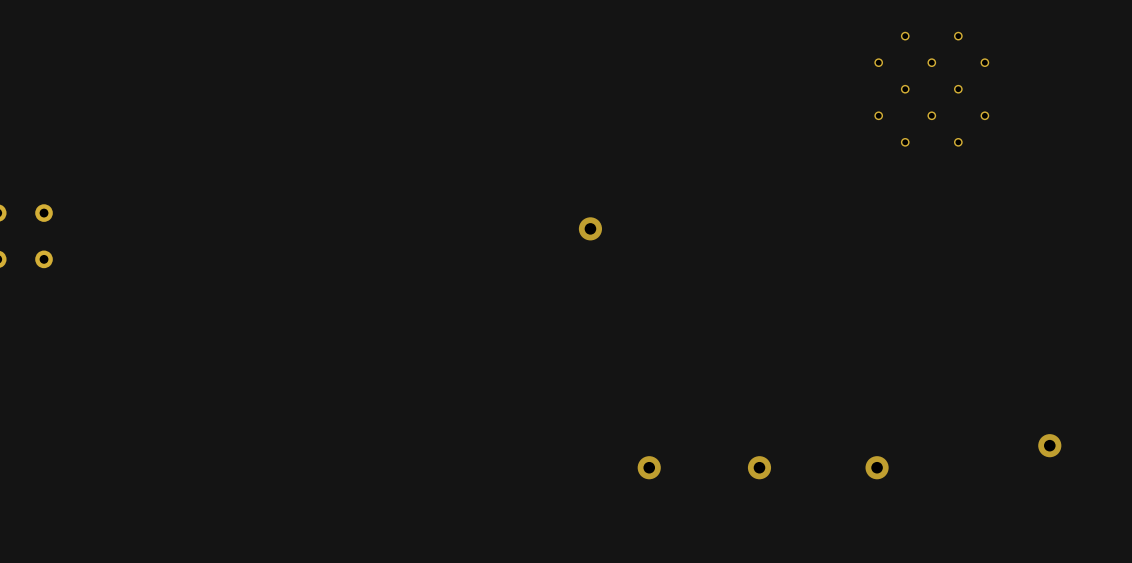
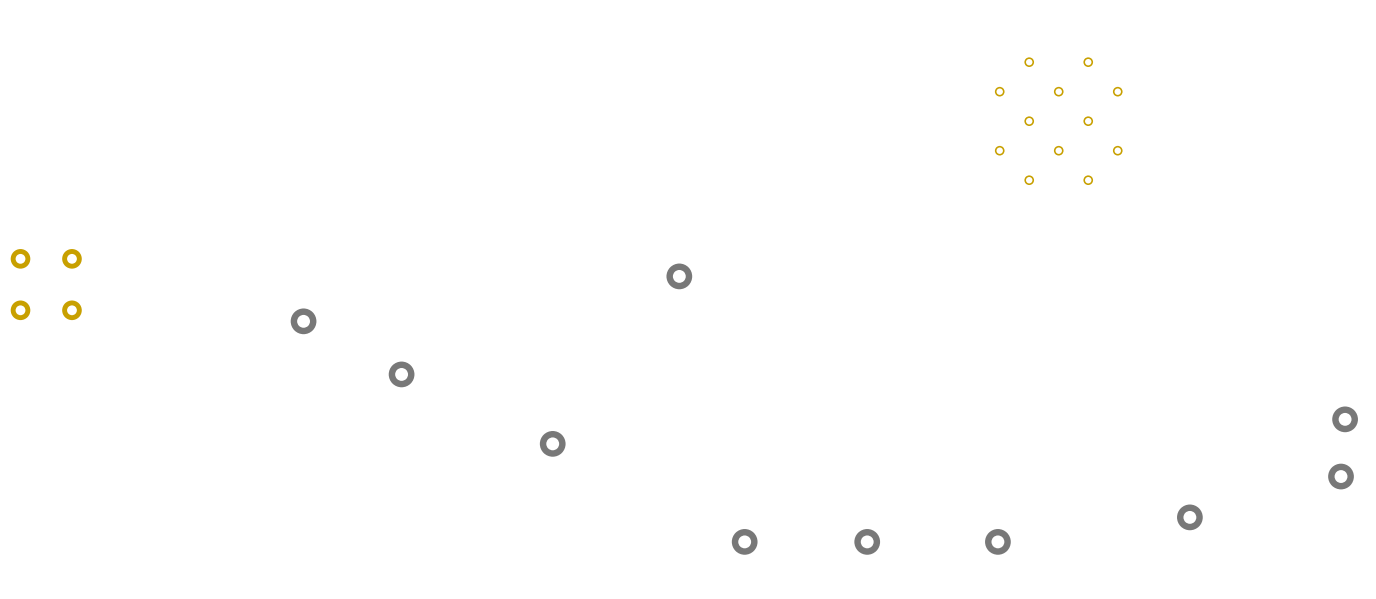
via: none -> (303, 321)
via: none -> (401, 374)
via: none -> (552, 443)

